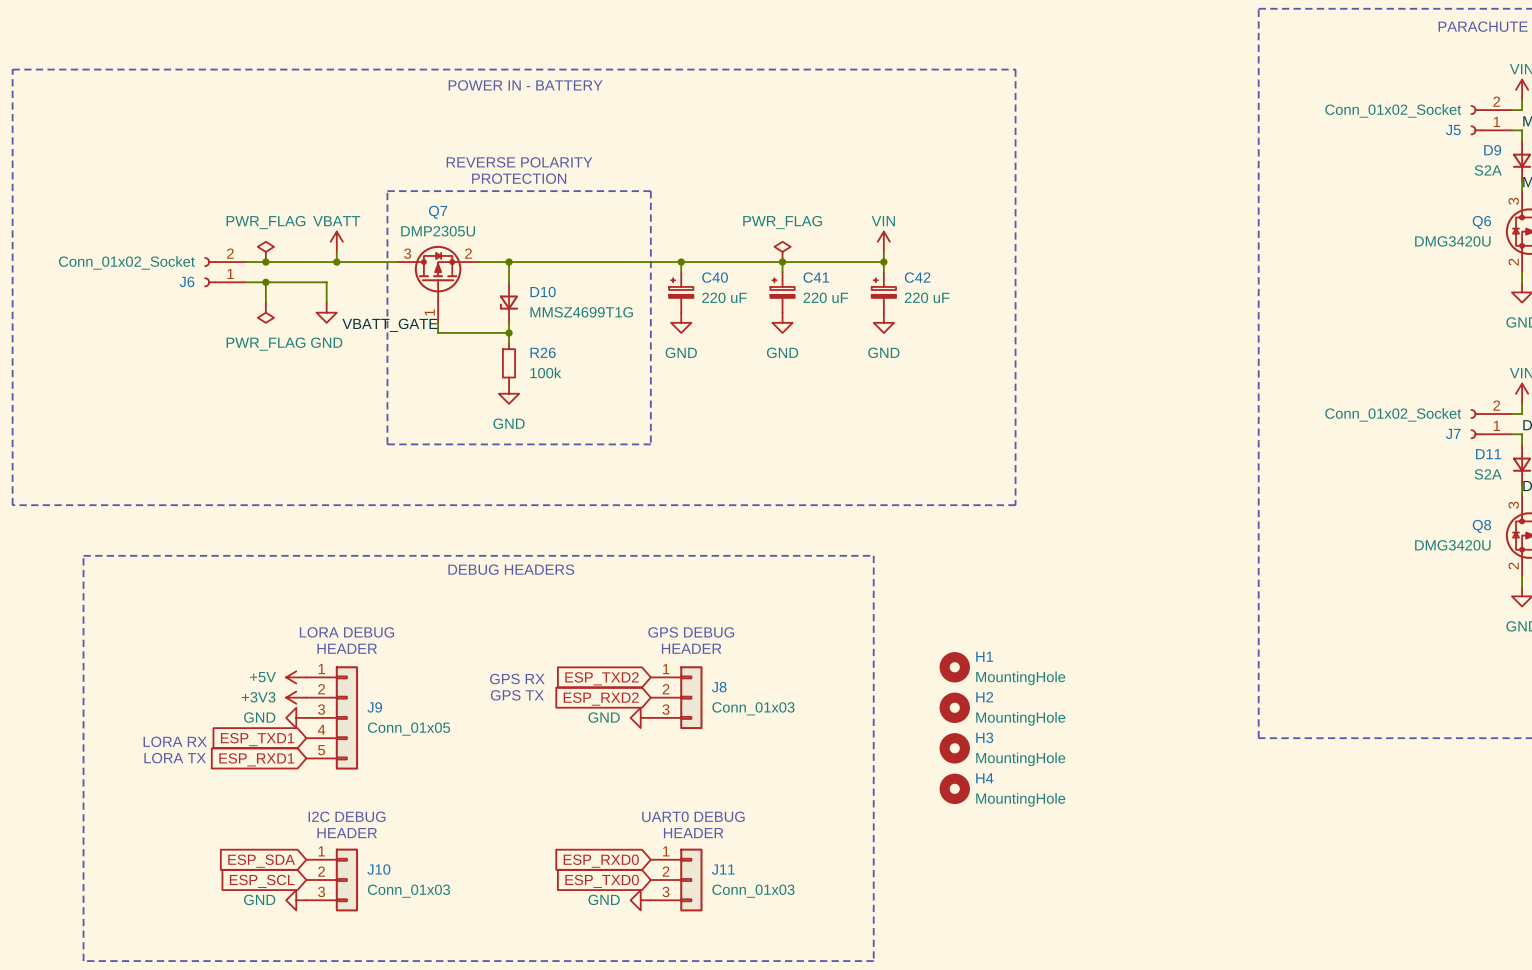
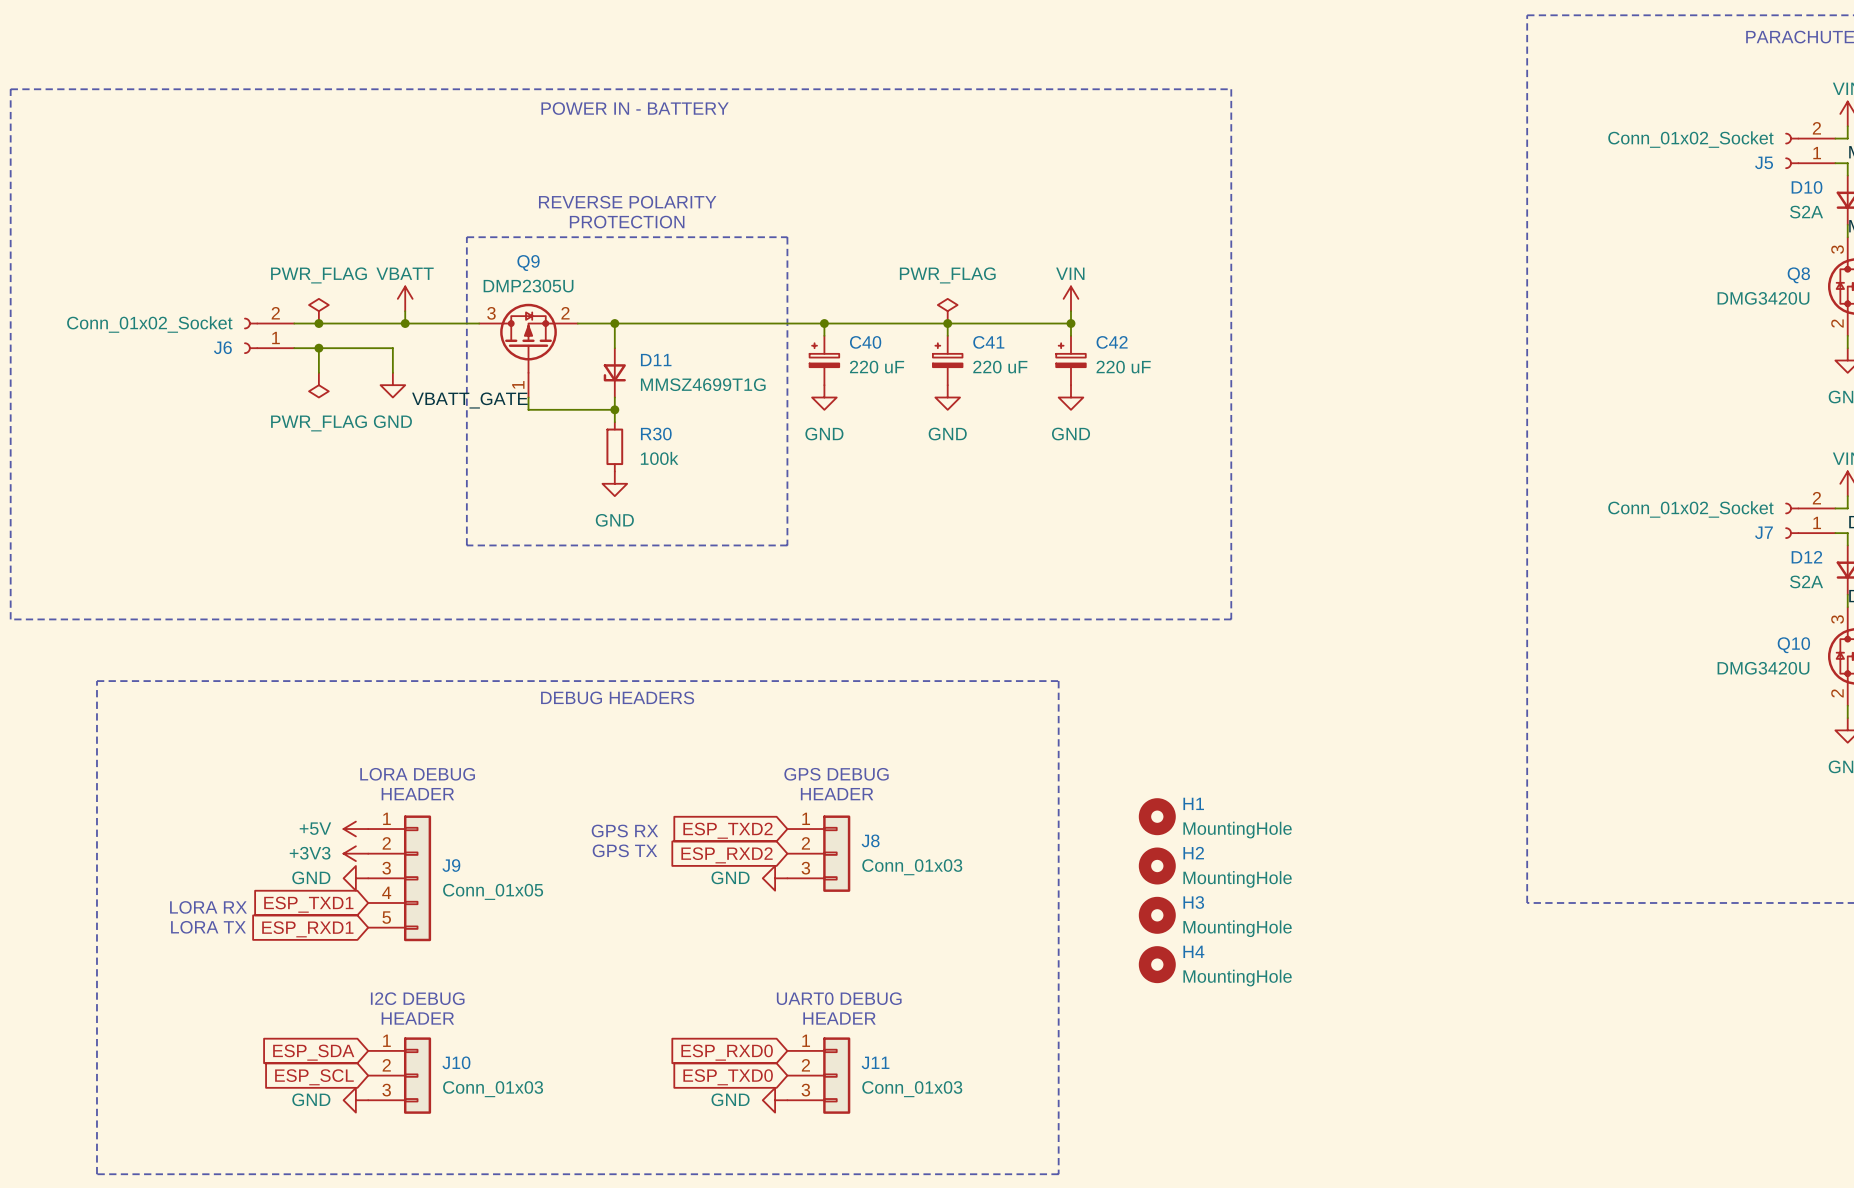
D9 name: D9 (1492, 150) -> D10 (1807, 187)
Q7 name: Q7 (438, 212) -> Q9 (528, 263)
Q6 name: Q6 (1481, 222) -> Q8 (1798, 275)
D10 name: D10 (543, 292) -> D11 (656, 360)
R26 name: R26 (543, 352) -> R30 (656, 434)
D11 name: D11 (1488, 454) -> D12 (1806, 557)
Q8 name: Q8 (1481, 526) -> Q10 (1793, 645)

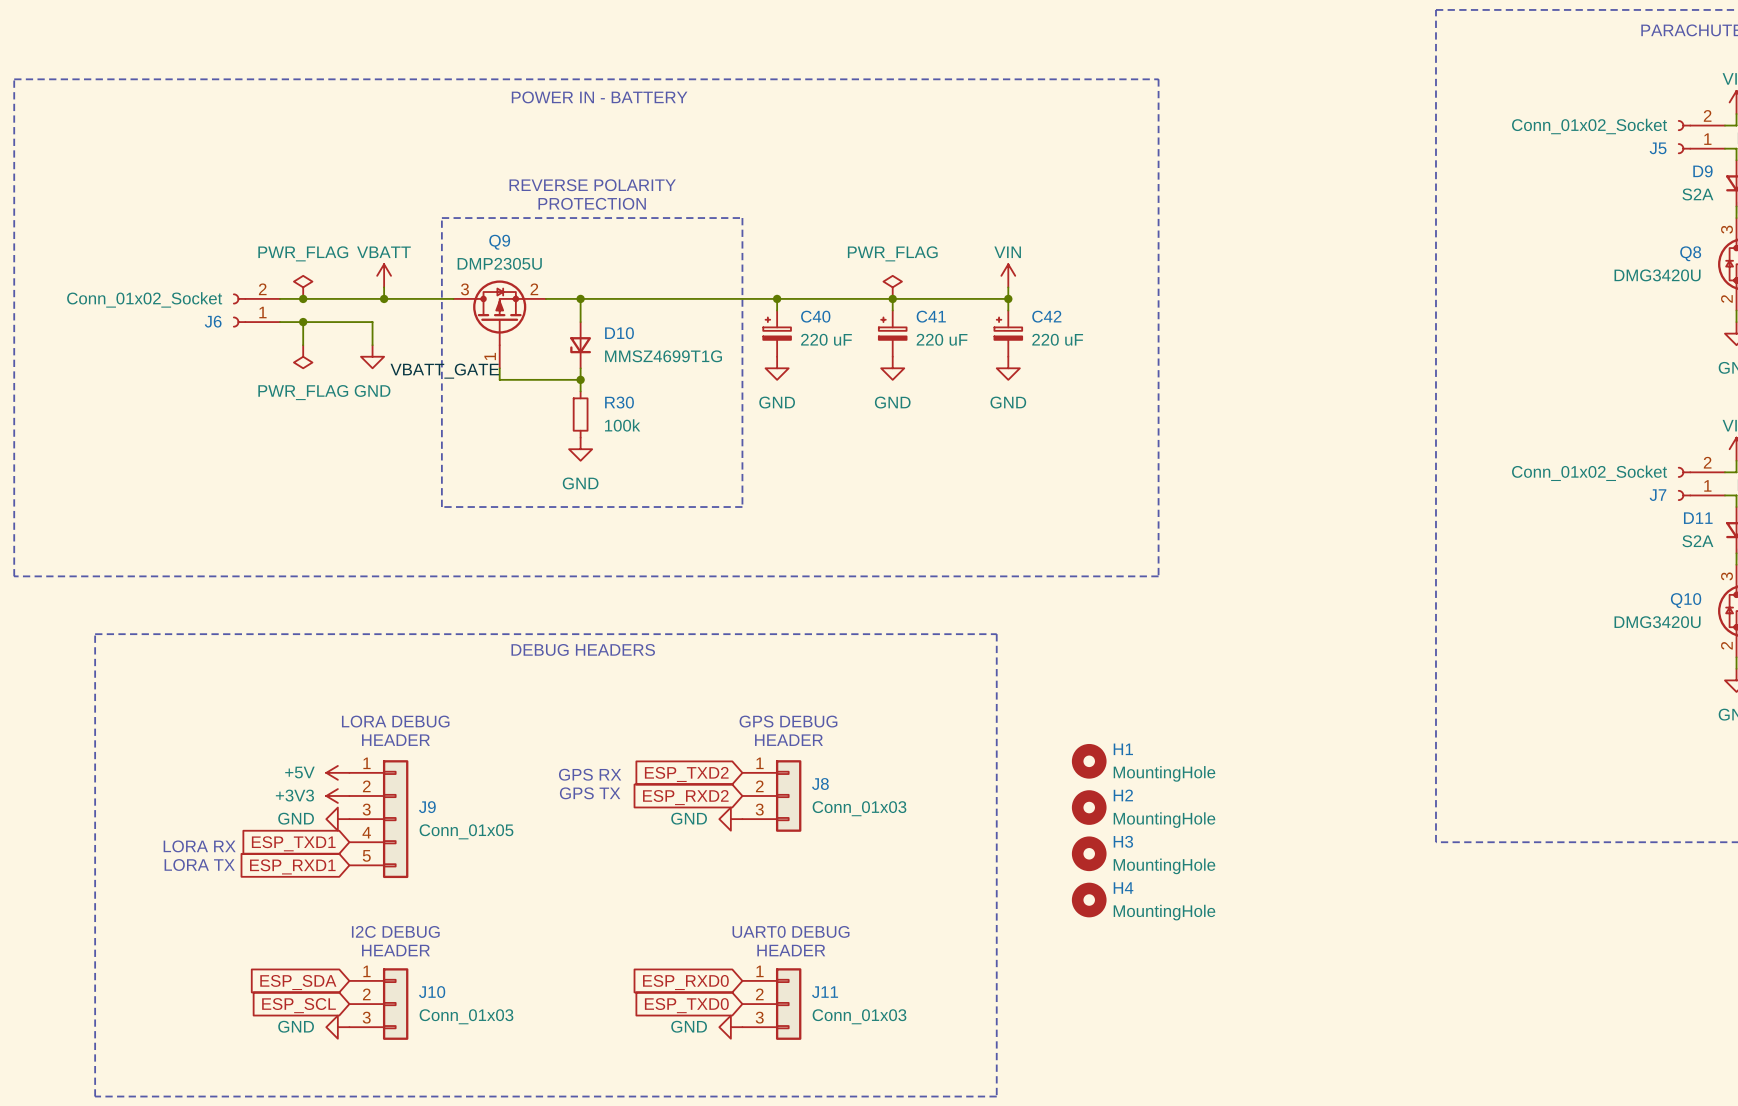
D10 name: D10 (1807, 187) -> D9 (1702, 171)
D11 name: D11 (656, 360) -> D10 (619, 333)
D12 name: D12 (1806, 557) -> D11 (1698, 518)

